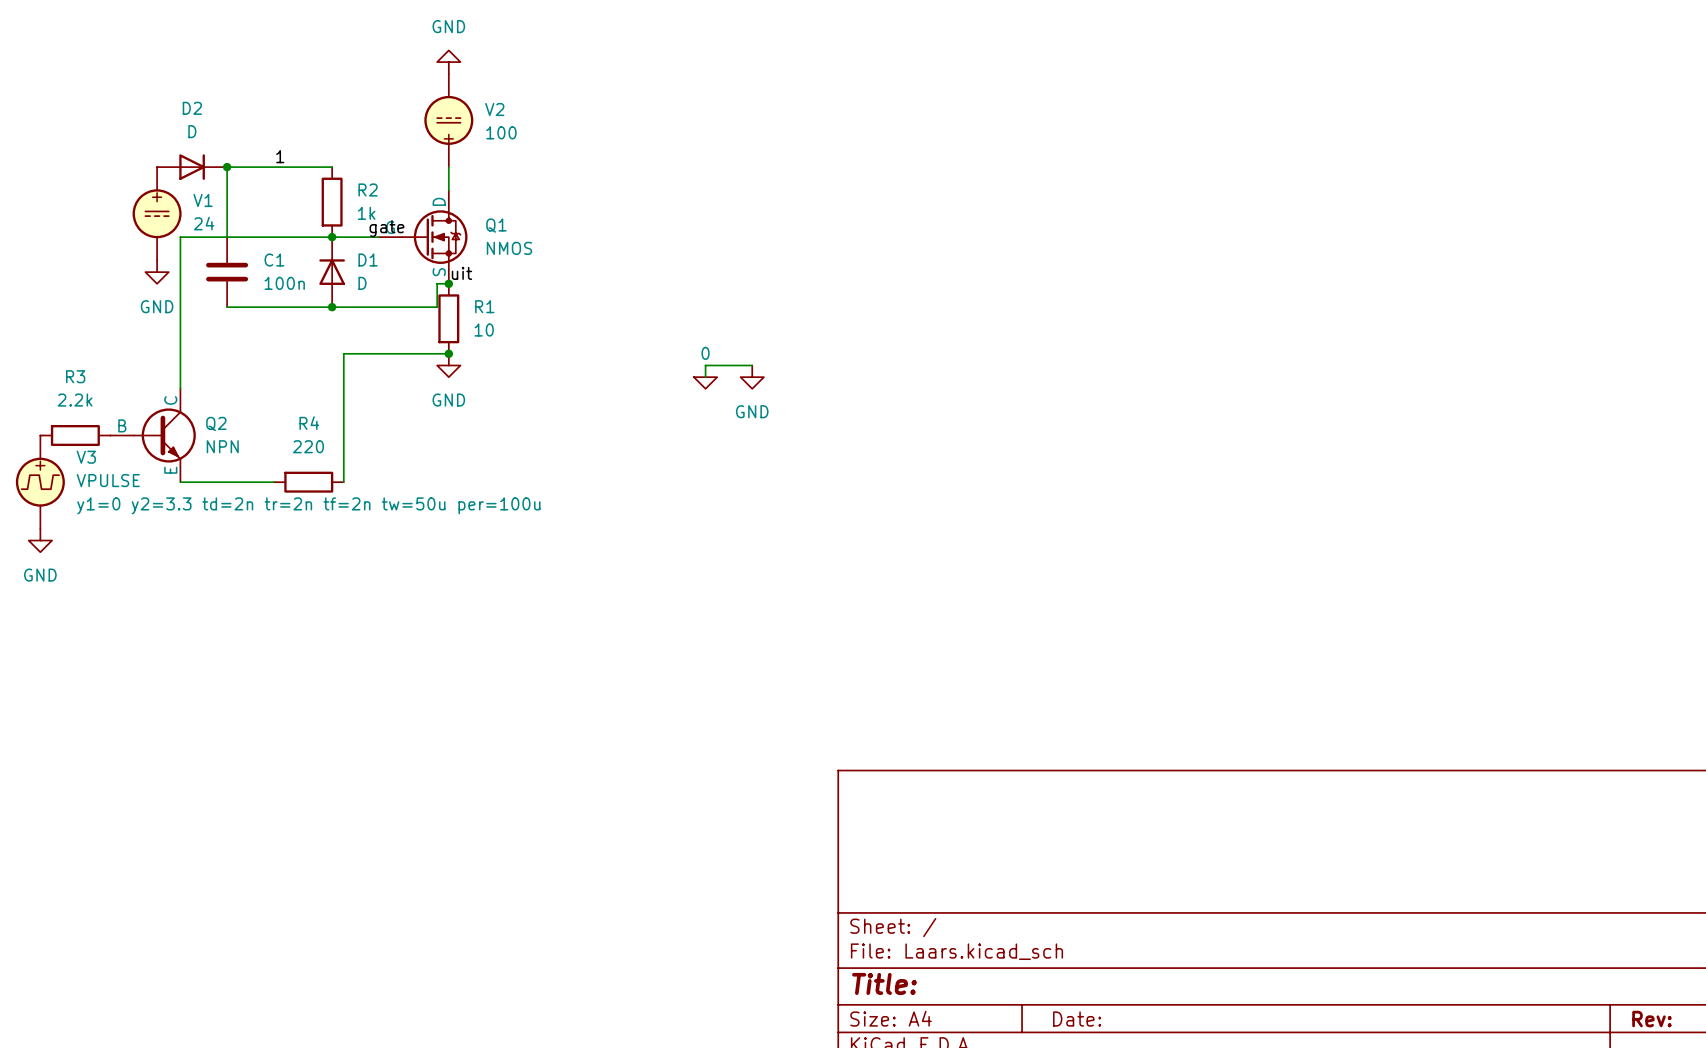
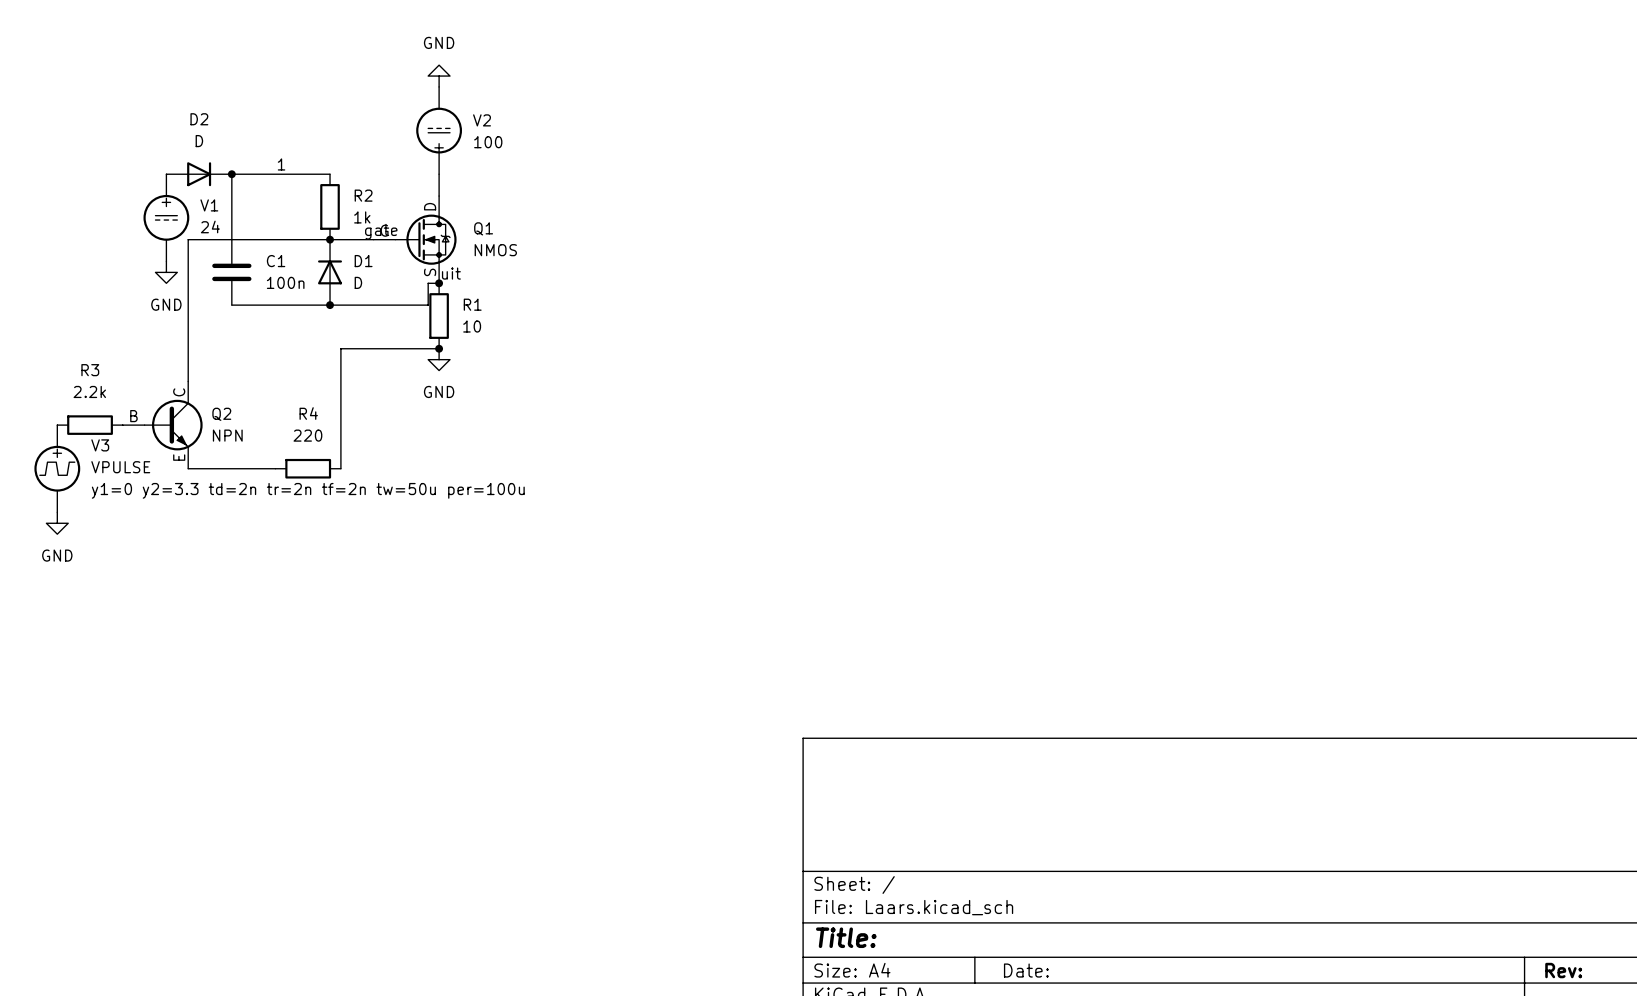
wire: (752, 365) (705, 365) (705, 377) -> none
power symbol: GND (752, 377) -> none
power symbol: 0 (705, 382) -> none

